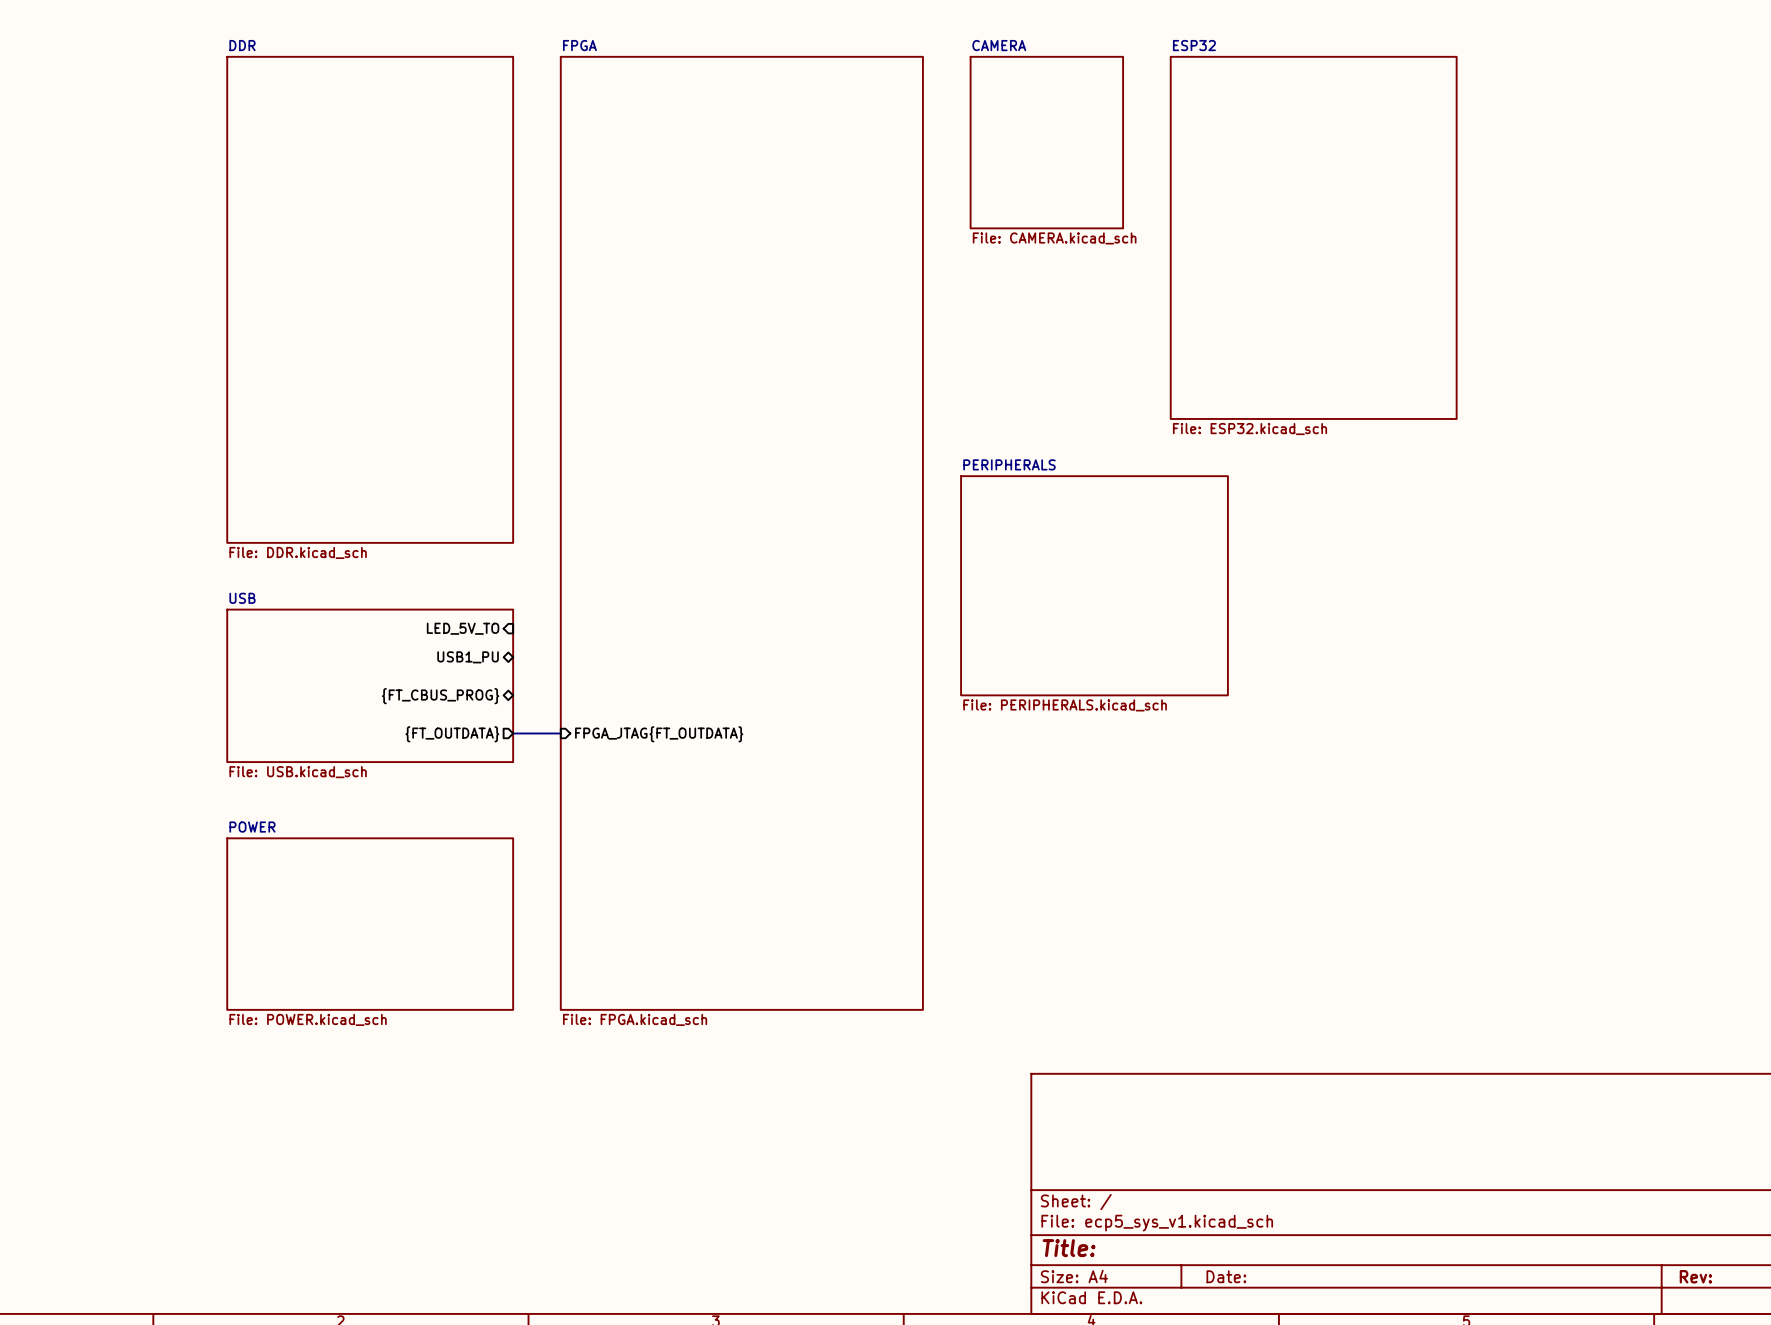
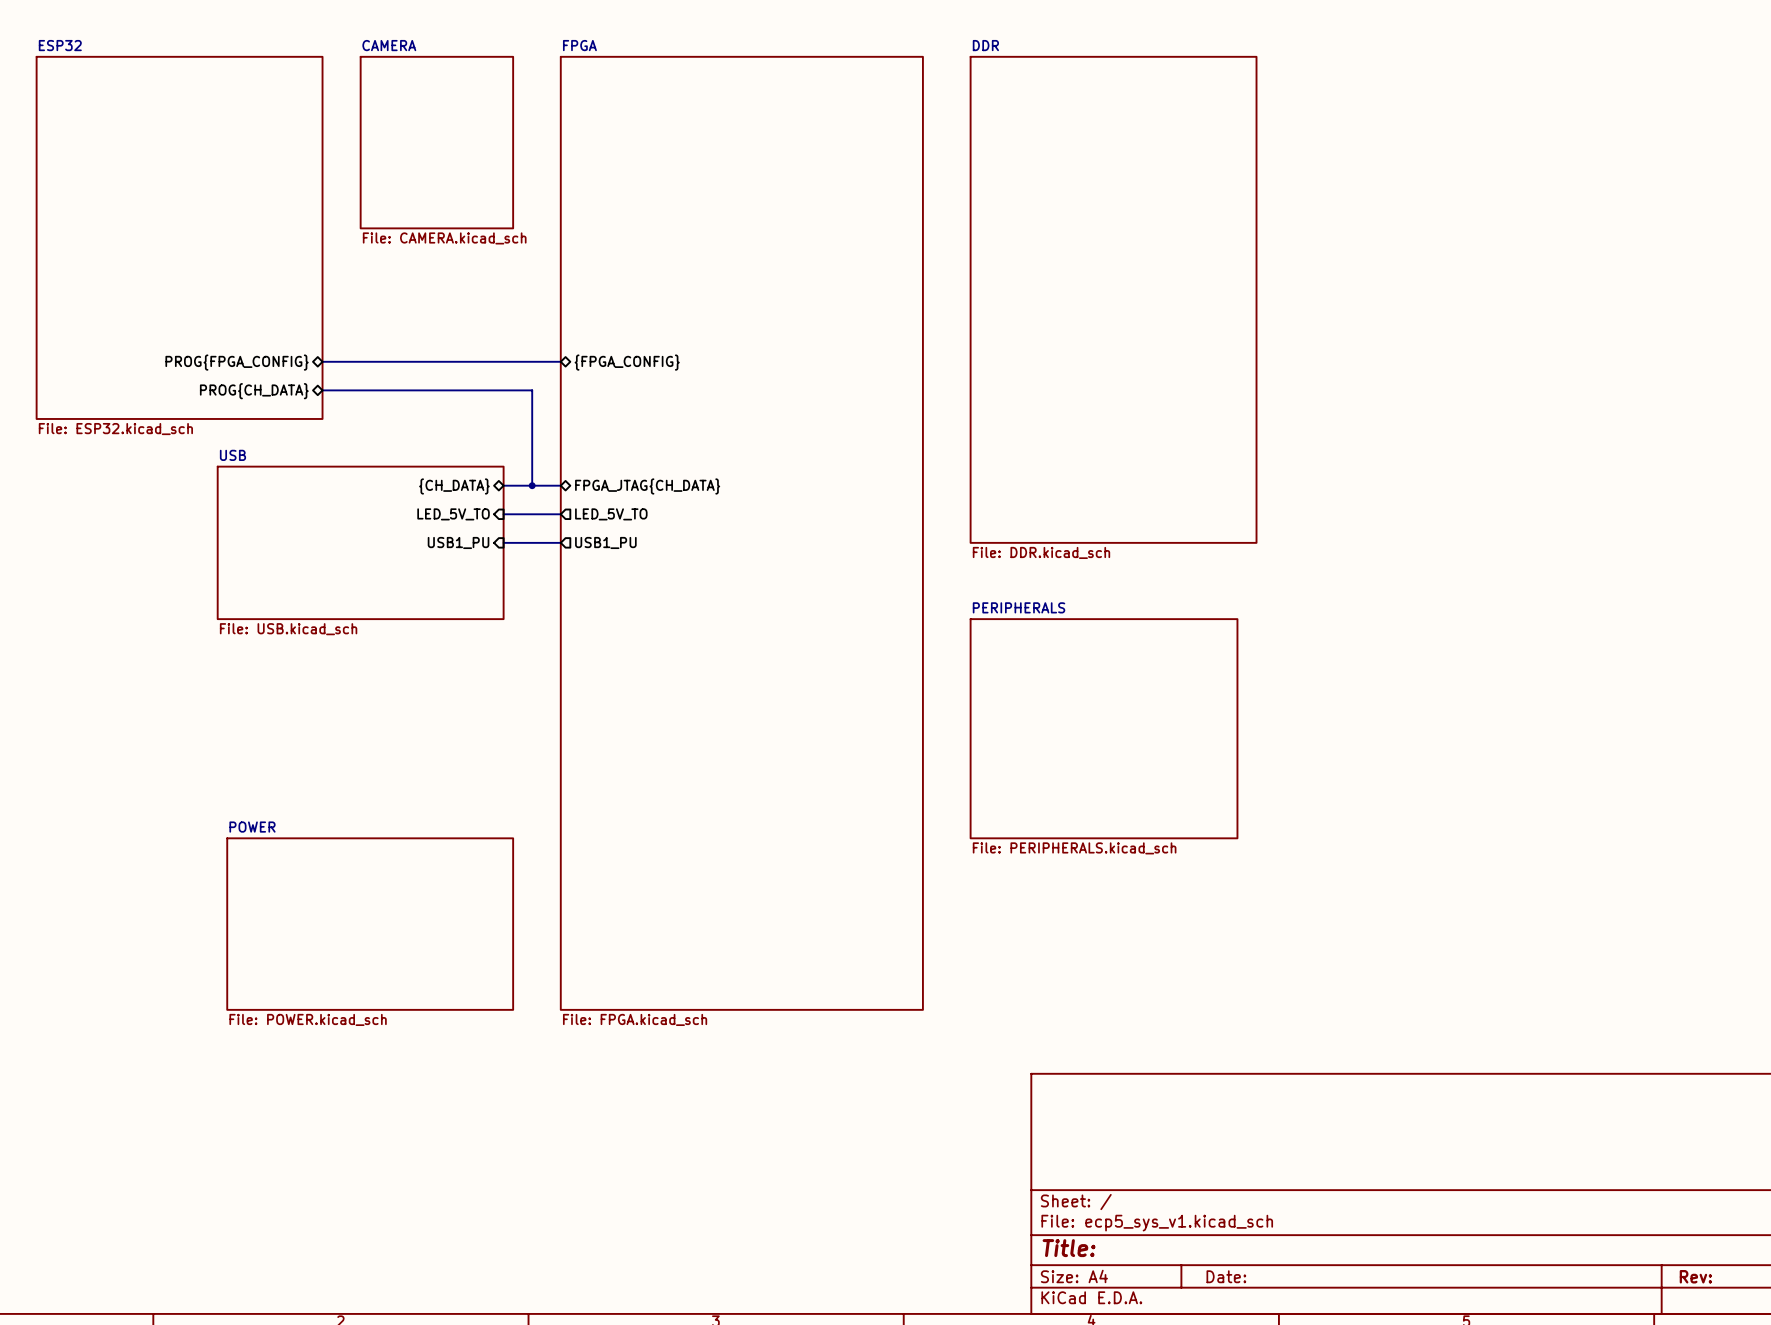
sheet CAMERA: none -> File: CAMERA.kicad_sch (436, 142)
sheet CAMERA: File: CAMERA.kicad_sch (1046, 142) -> none
sheet ESP32 position: (1313, 237) -> (179, 237)
sheet DDR: File: DDR.kicad_sch (370, 299) -> none
sheet DDR: none -> File: DDR.kicad_sch (1113, 299)
bus: none -> (322, 361) (560, 361)
sheet pin: none -> PROG{FPGA_CONFIG} (237, 362)
sheet pin: none -> {FPGA_CONFIG} (627, 362)
bus: none -> (322, 390) (532, 390) (532, 485)
sheet pin: none -> PROG{CH_DATA} (254, 391)
bus: none -> (503, 485) (560, 485)
junction: none -> (532, 485)
sheet pin: none -> {CH_DATA} (454, 486)
sheet pin: none -> FPGA_JTAG{CH_DATA} (647, 486)
sheet pin: none -> LED_5V_TO (453, 514)
wire: none -> (503, 514) (560, 514)
sheet pin: none -> LED_5V_TO (611, 514)
sheet pin: none -> USB1_PU (458, 542)
wire: none -> (503, 542) (560, 542)
sheet pin: none -> USB1_PU (605, 542)
sheet PERIPHERALS position: (1094, 585) -> (1104, 728)
sheet pin: LED_5V_TO (463, 628) -> none
sheet pin: USB1_PU (468, 657) -> none
sheet USB position: (370, 685) -> (360, 542)
sheet pin: {FT_CBUS_PROG} (440, 696) -> none
bus: (513, 733) (560, 733) -> none
sheet pin: {FT_OUTDATA} (452, 734) -> none
sheet pin: FPGA_JTAG{FT_OUTDATA} (659, 734) -> none

